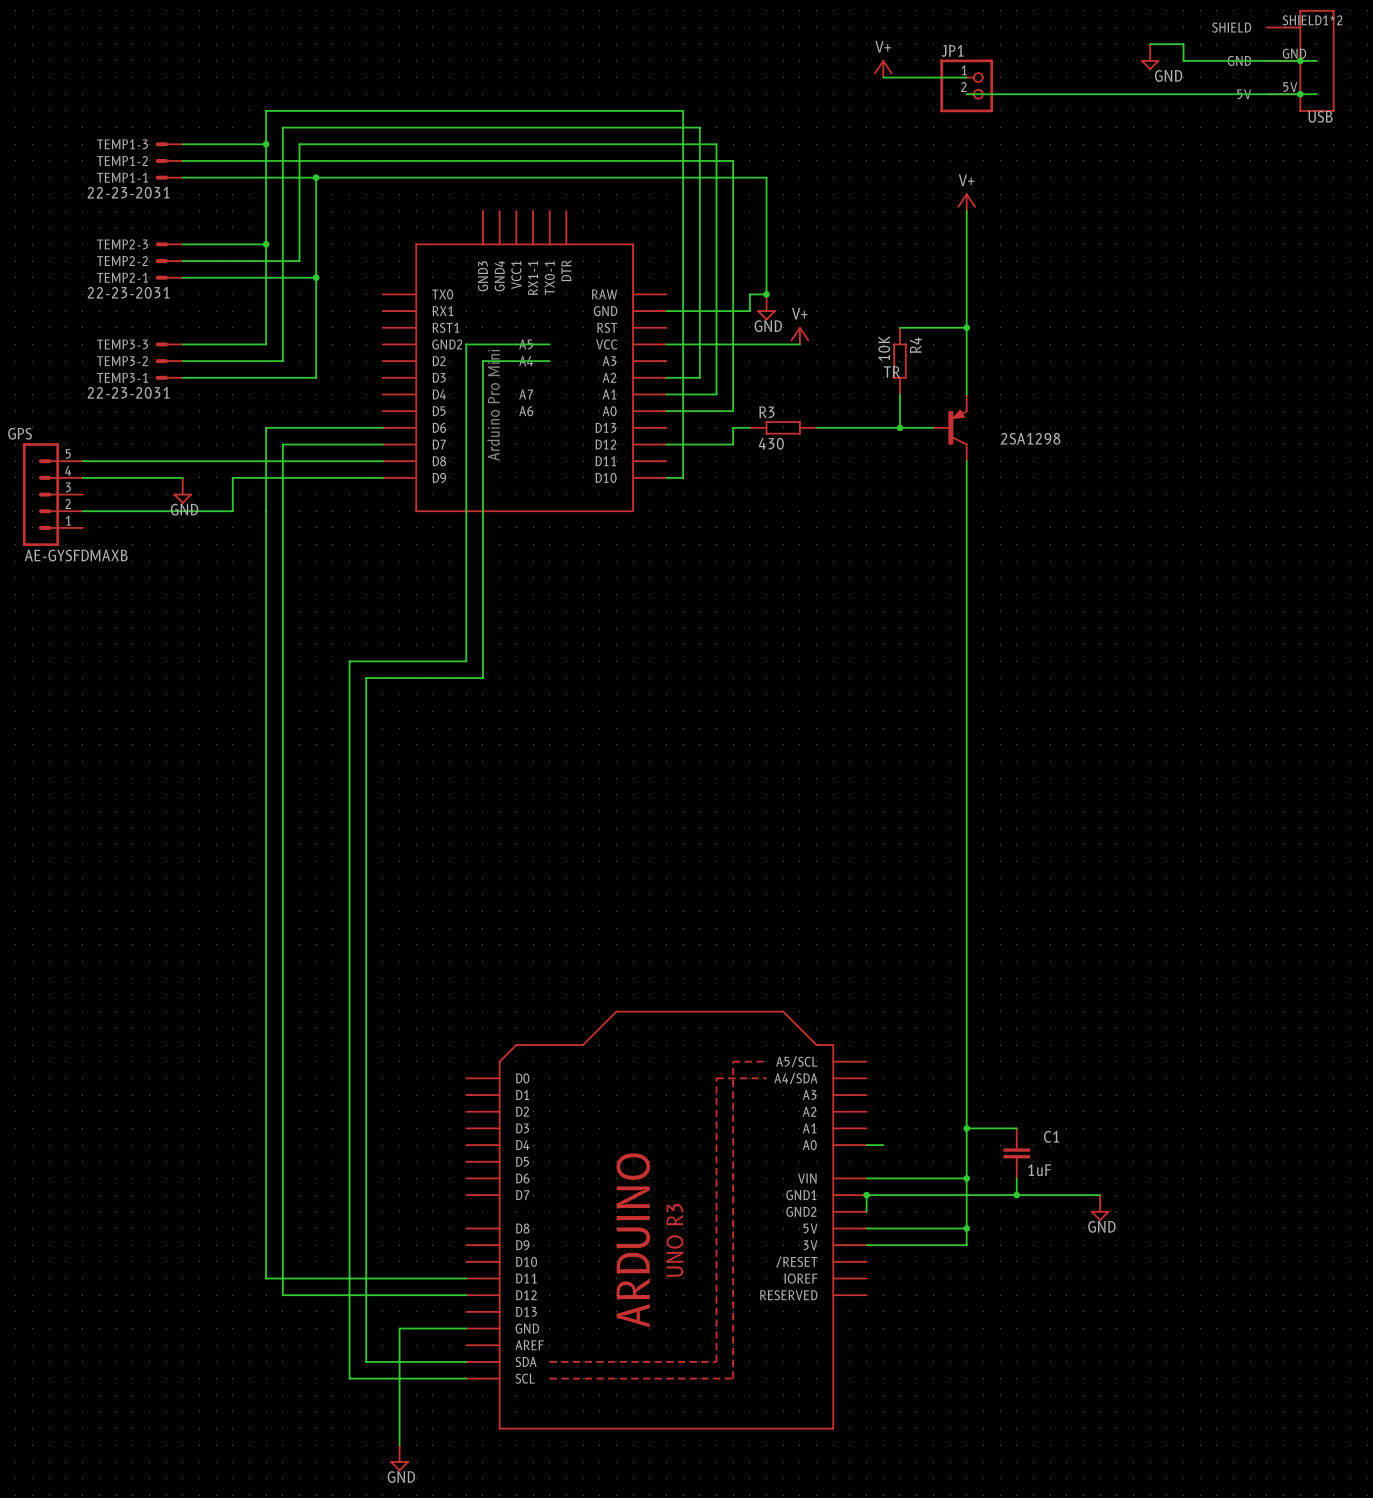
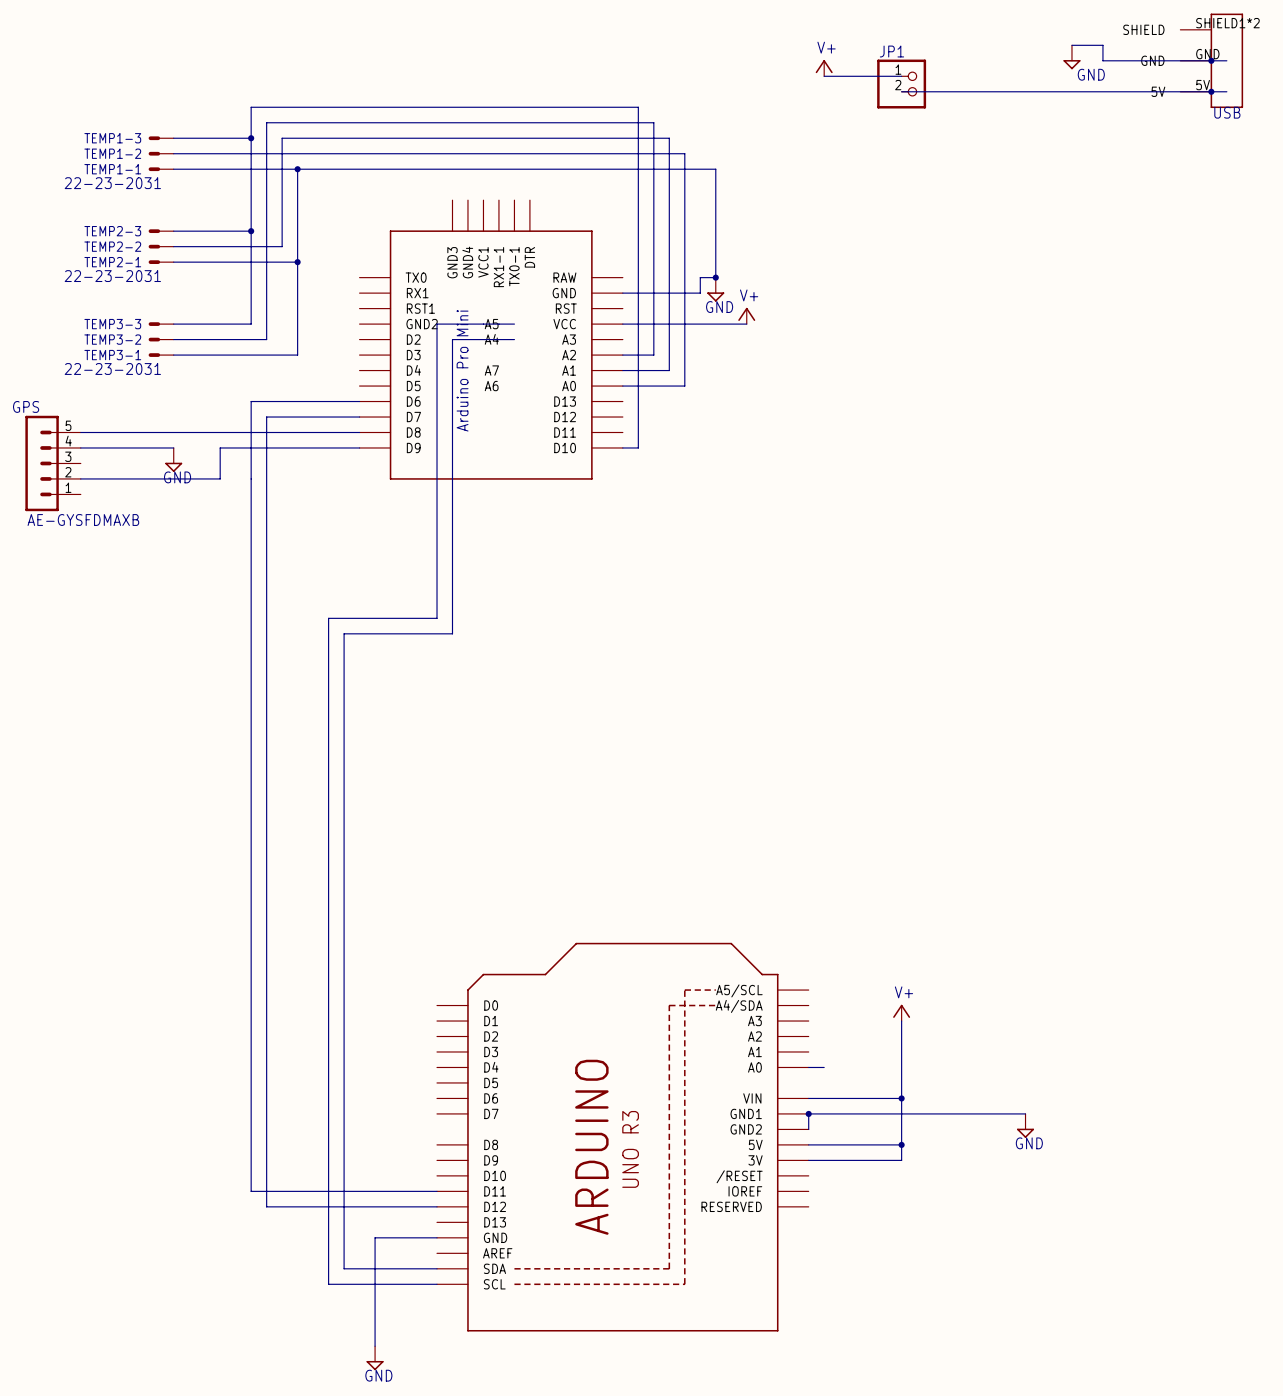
power symbol: V+ (966, 202) -> none
wire: (966, 211) (966, 394) -> none
wire: (899, 327) (966, 327) -> none
junction: (966, 327) -> none
R4: 10K (899, 361) -> none
wire: (899, 394) (899, 427) -> none
wire: (749, 427) (733, 427) (733, 444) (666, 444) -> none
R3: 430 (783, 427) -> none
wire: (816, 427) (933, 427) -> none
junction: (899, 427) -> none
TR: 2SA1298 (950, 427) -> none
wire: (966, 461) (966, 1095) -> none
power symbol: none -> V+ (901, 1012)
wire: (966, 1128) (1016, 1128) -> none
junction: (966, 1128) -> none
C1: 1uF (1016, 1153) -> none
wire: (1016, 1178) (1016, 1195) -> none
junction: (1016, 1195) -> none

